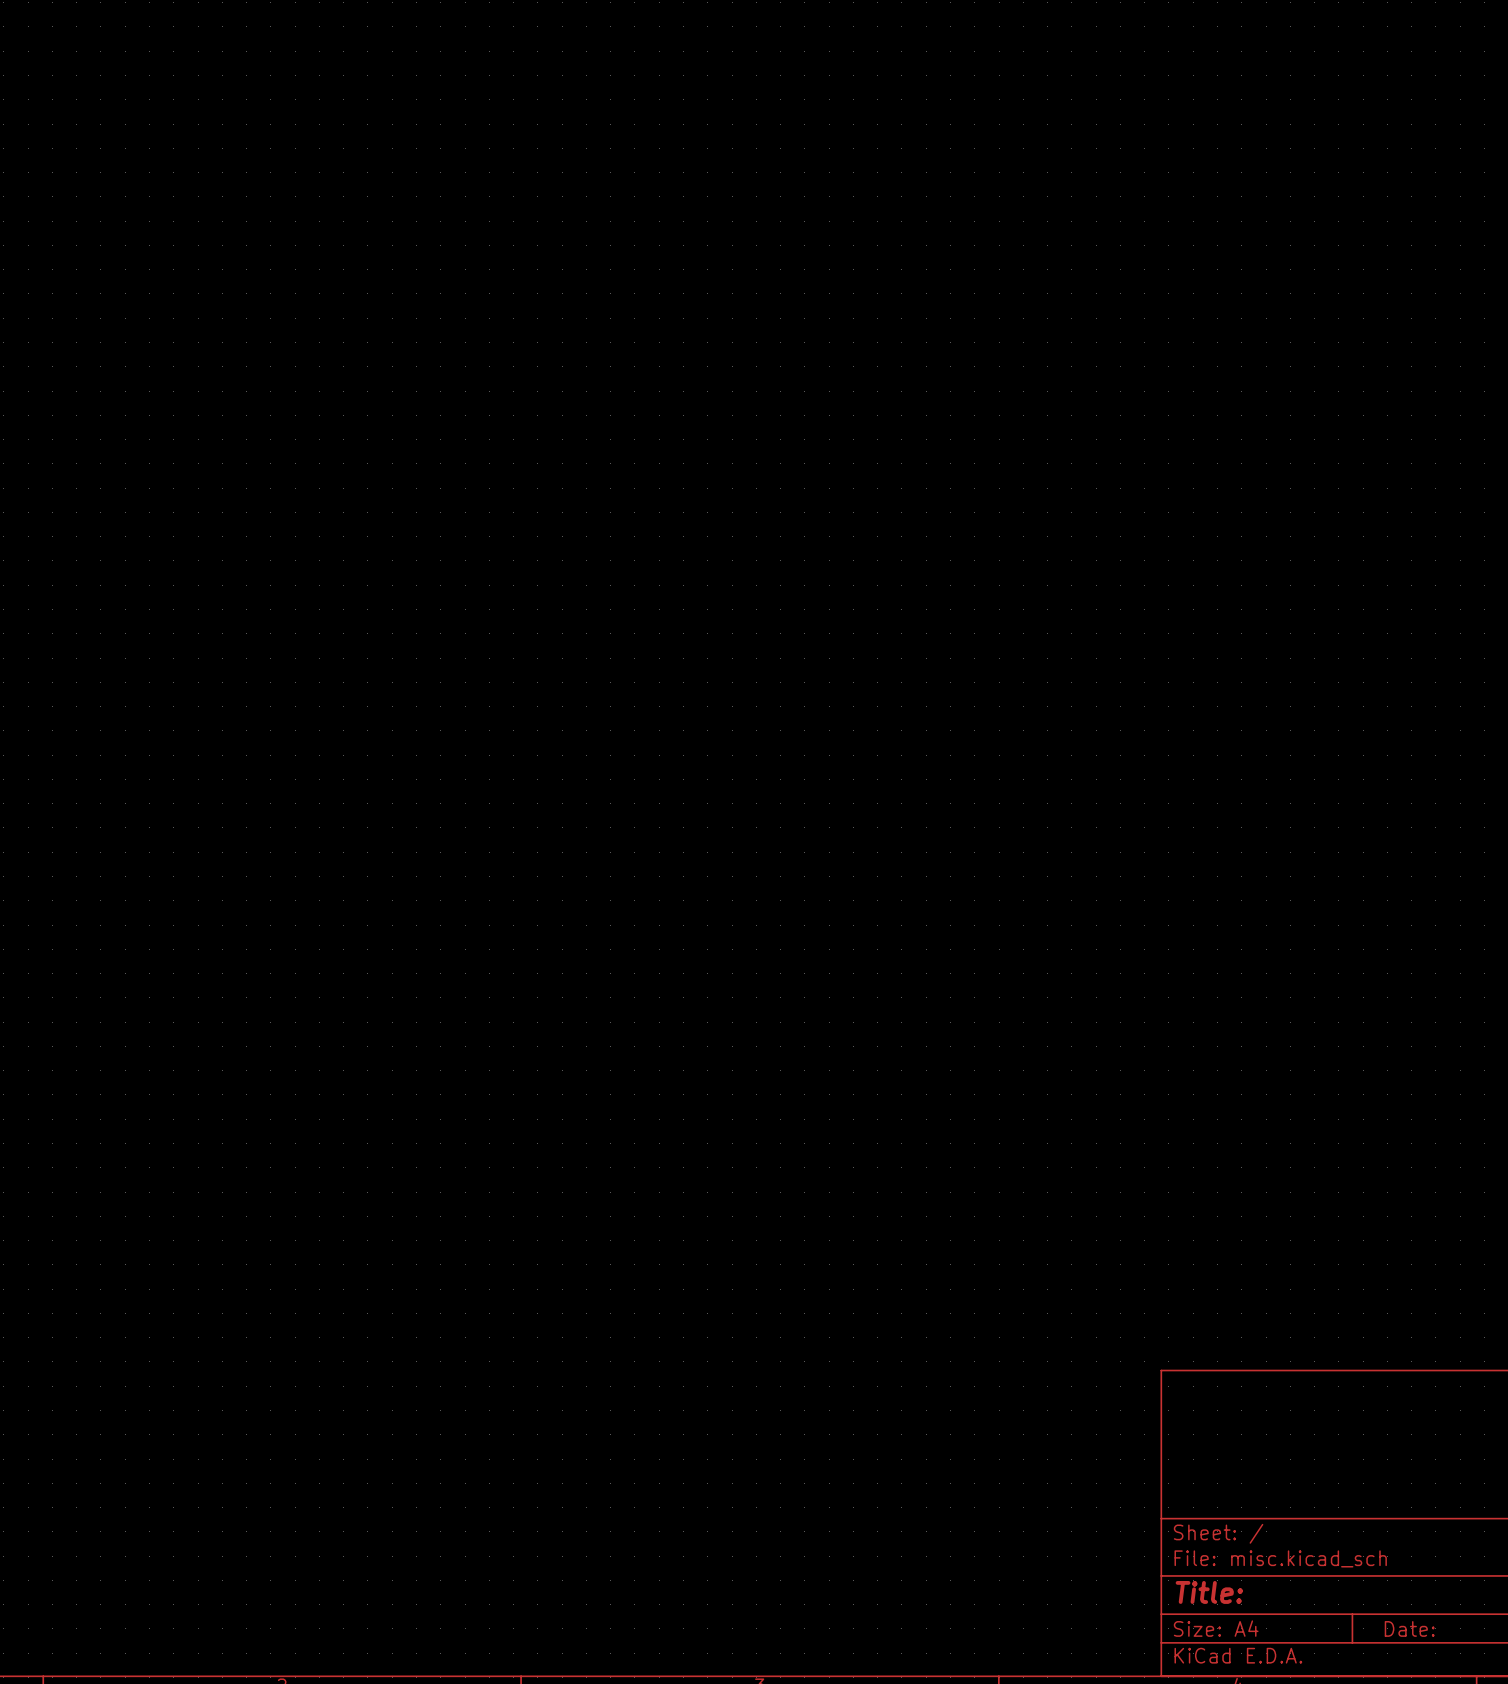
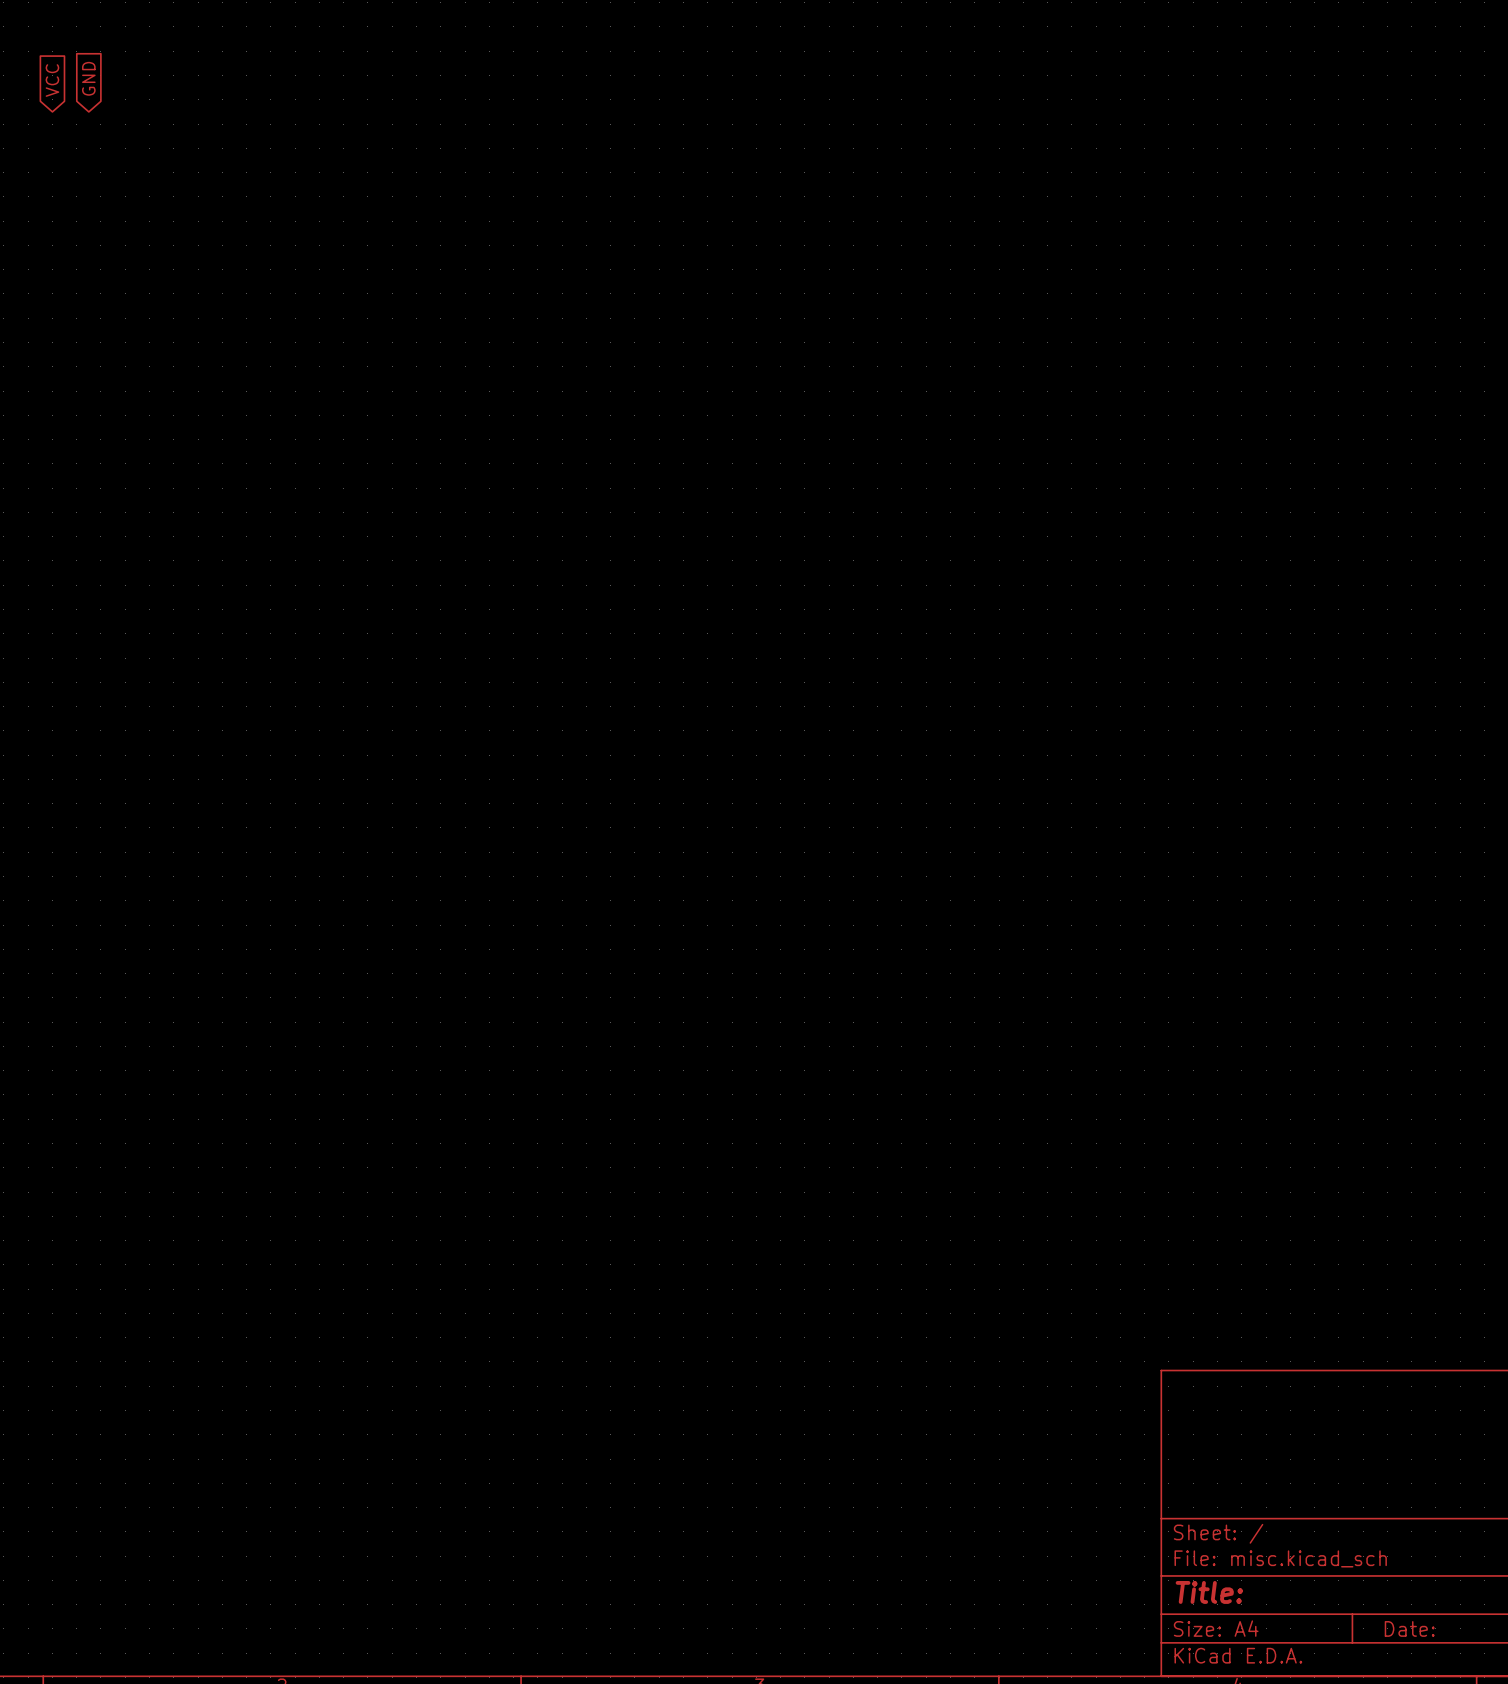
global label: none -> GND (88, 78)
global label: none -> VCC (52, 80)

